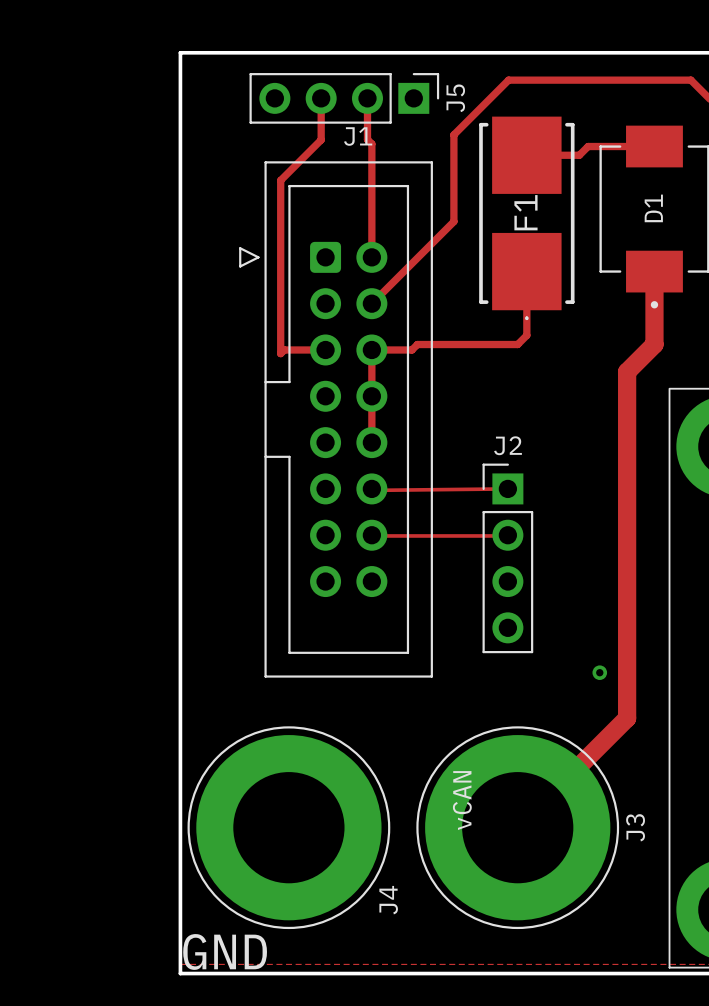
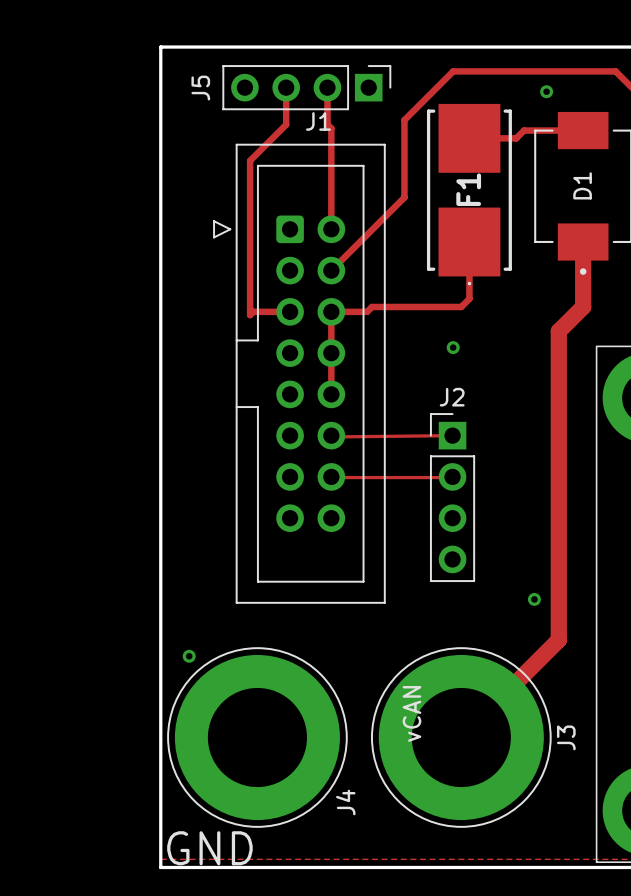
J5 name position: J5 (455, 98) -> J5 (200, 88)
via: none -> (546, 91)
via: none -> (453, 347)
via: none -> (189, 656)

